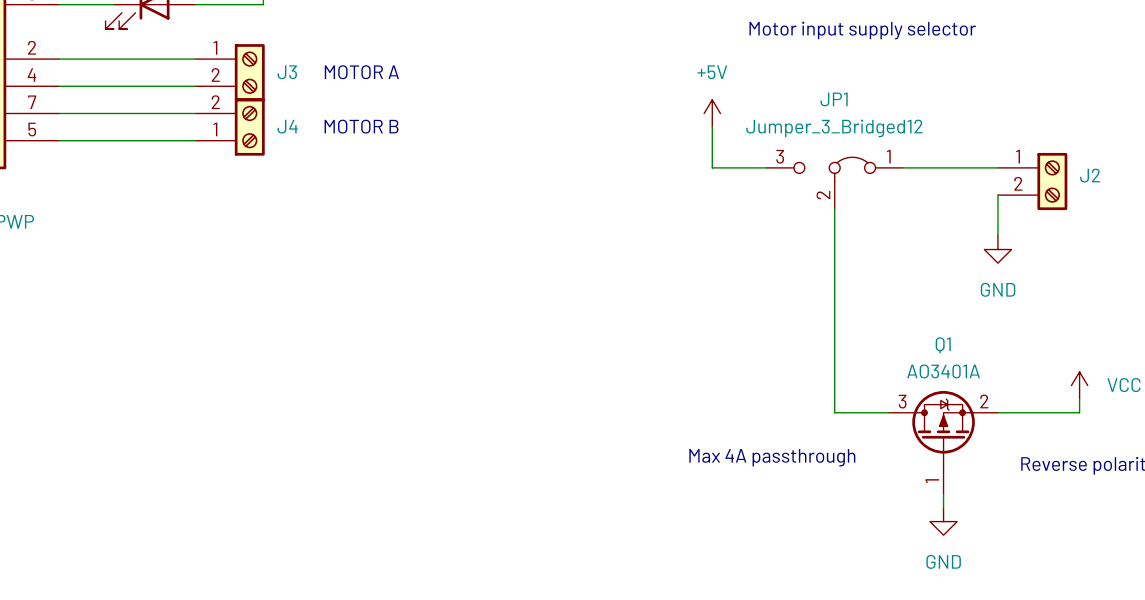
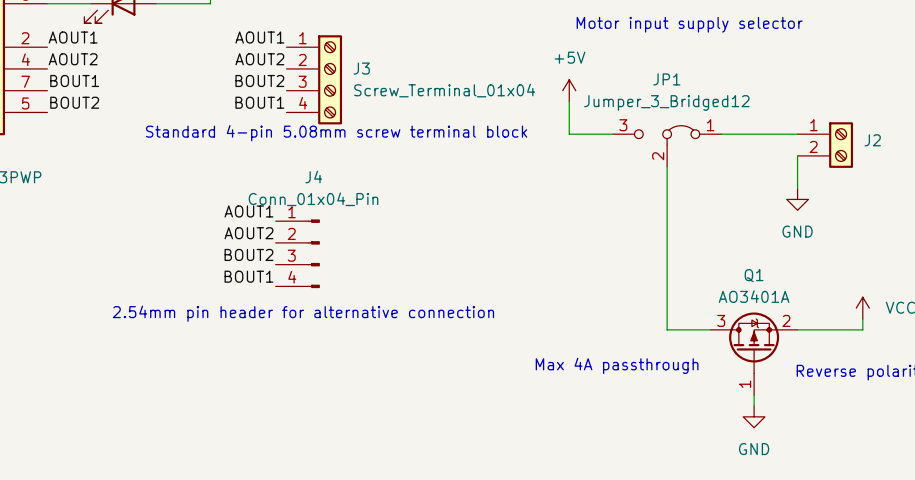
J3 symbol: [195, 44, 265, 102] -> [286, 35, 343, 125]
label: none -> AOUT1 (73, 37)
label: none -> AOUT1 (259, 37)
wire: (59, 59) (195, 59) -> none
text: MOTOR A (361, 72) -> none
label: none -> AOUT2 (73, 59)
label: none -> AOUT2 (259, 59)
wire: (59, 86) (195, 86) -> none
J4 symbol: [195, 98, 265, 156] -> [275, 219, 320, 289]
label: none -> BOUT1 (74, 81)
label: none -> BOUT2 (259, 81)
J3 value: none -> Screw_Terminal_01x04 (444, 90)
wire: (59, 113) (195, 113) -> none
J4 name position: J4 (287, 126) -> J4 (313, 177)
text: MOTOR B (361, 126) -> none
label: none -> BOUT2 (74, 102)
label: none -> BOUT1 (259, 102)
wire: (59, 140) (195, 140) -> none
text: none -> Standard 4-pin 5.08mm screw terminal block (336, 133)
J4 value: none -> Conn_01x04_Pin (313, 199)
label: none -> AOUT1 (248, 211)
label: none -> AOUT2 (248, 233)
label: none -> BOUT2 (248, 254)
label: none -> BOUT1 (248, 276)
text: none -> 2.54mm pin header for alternative connection (303, 313)

